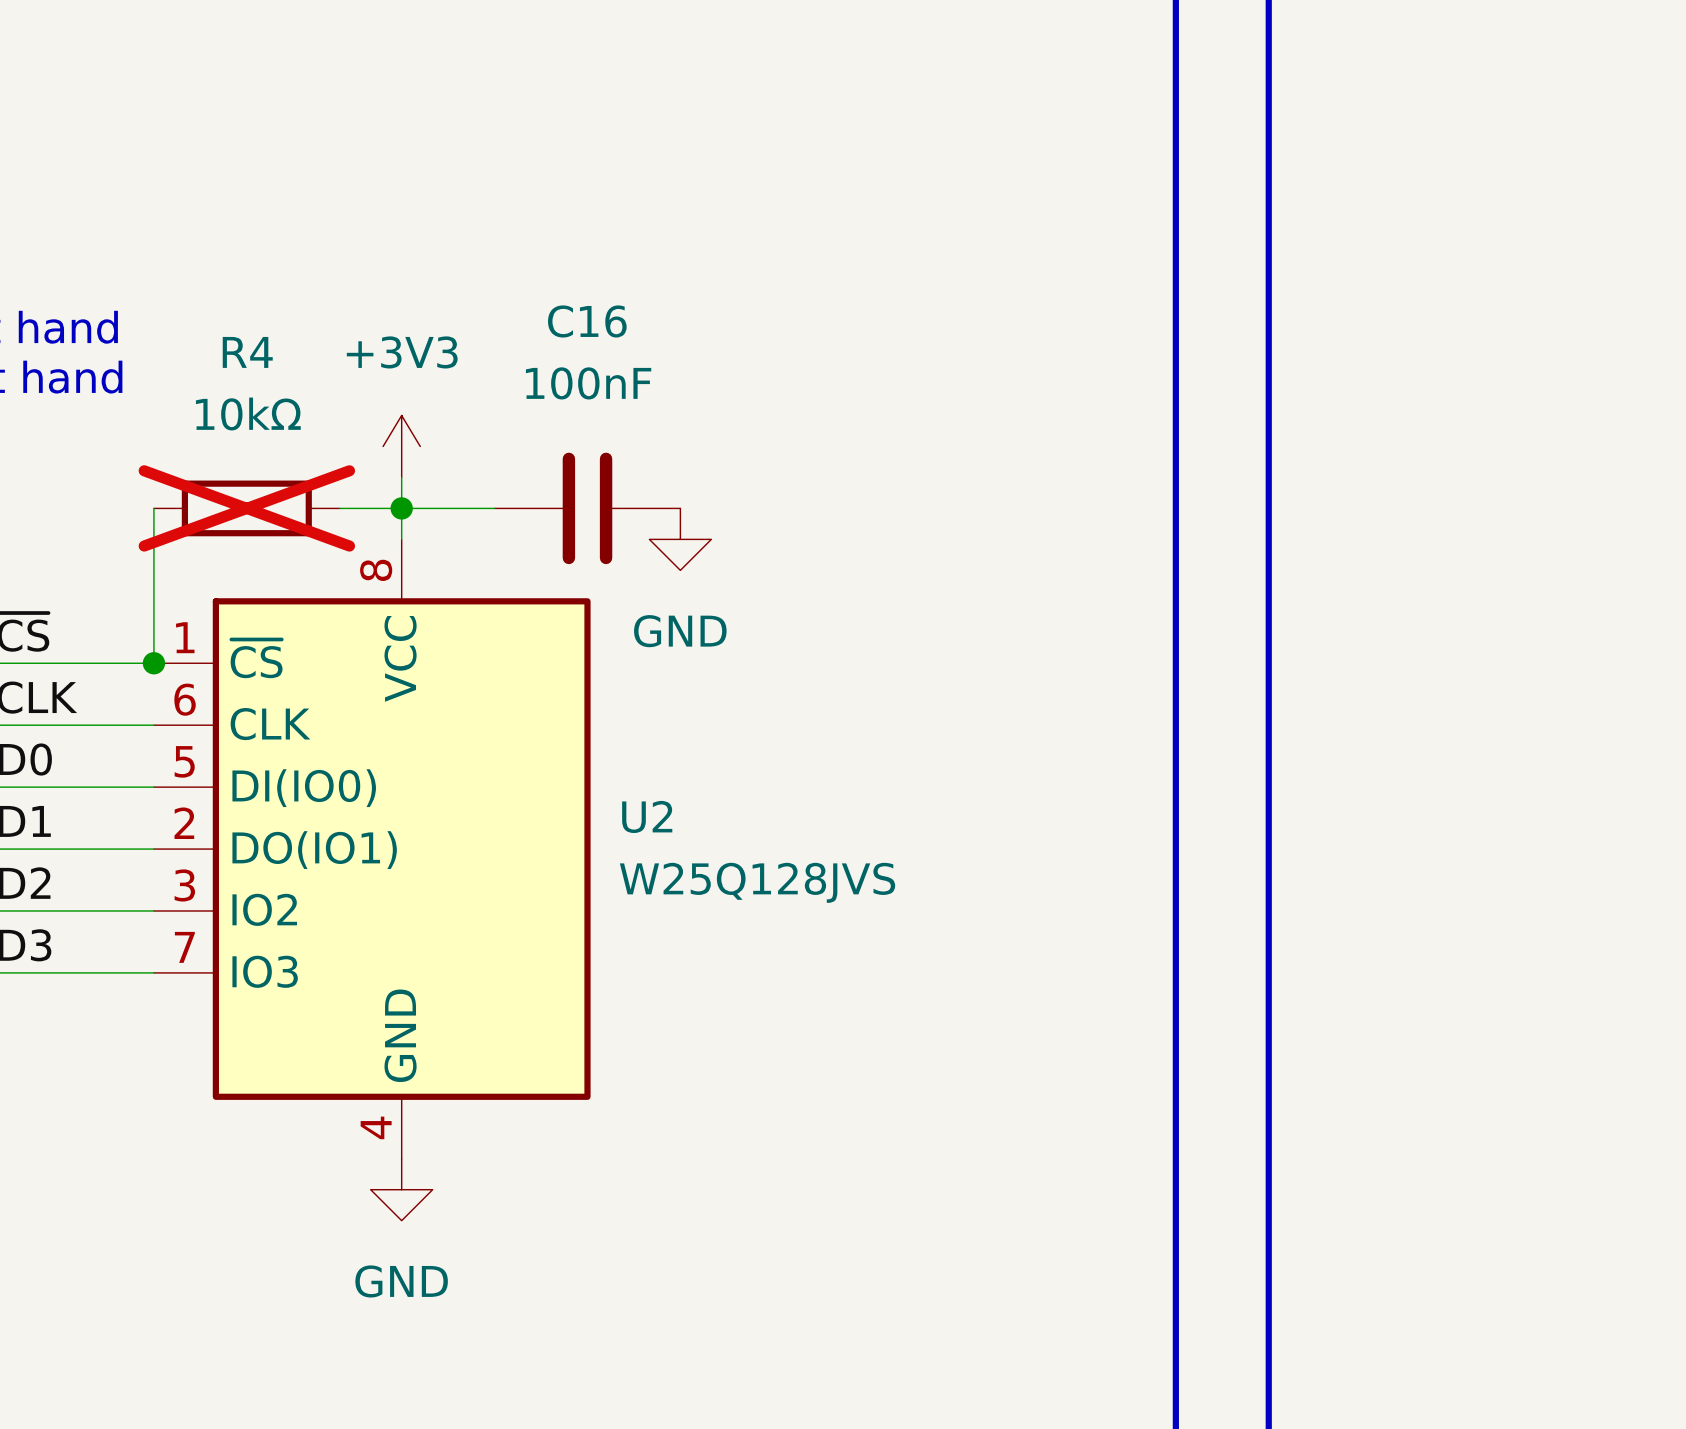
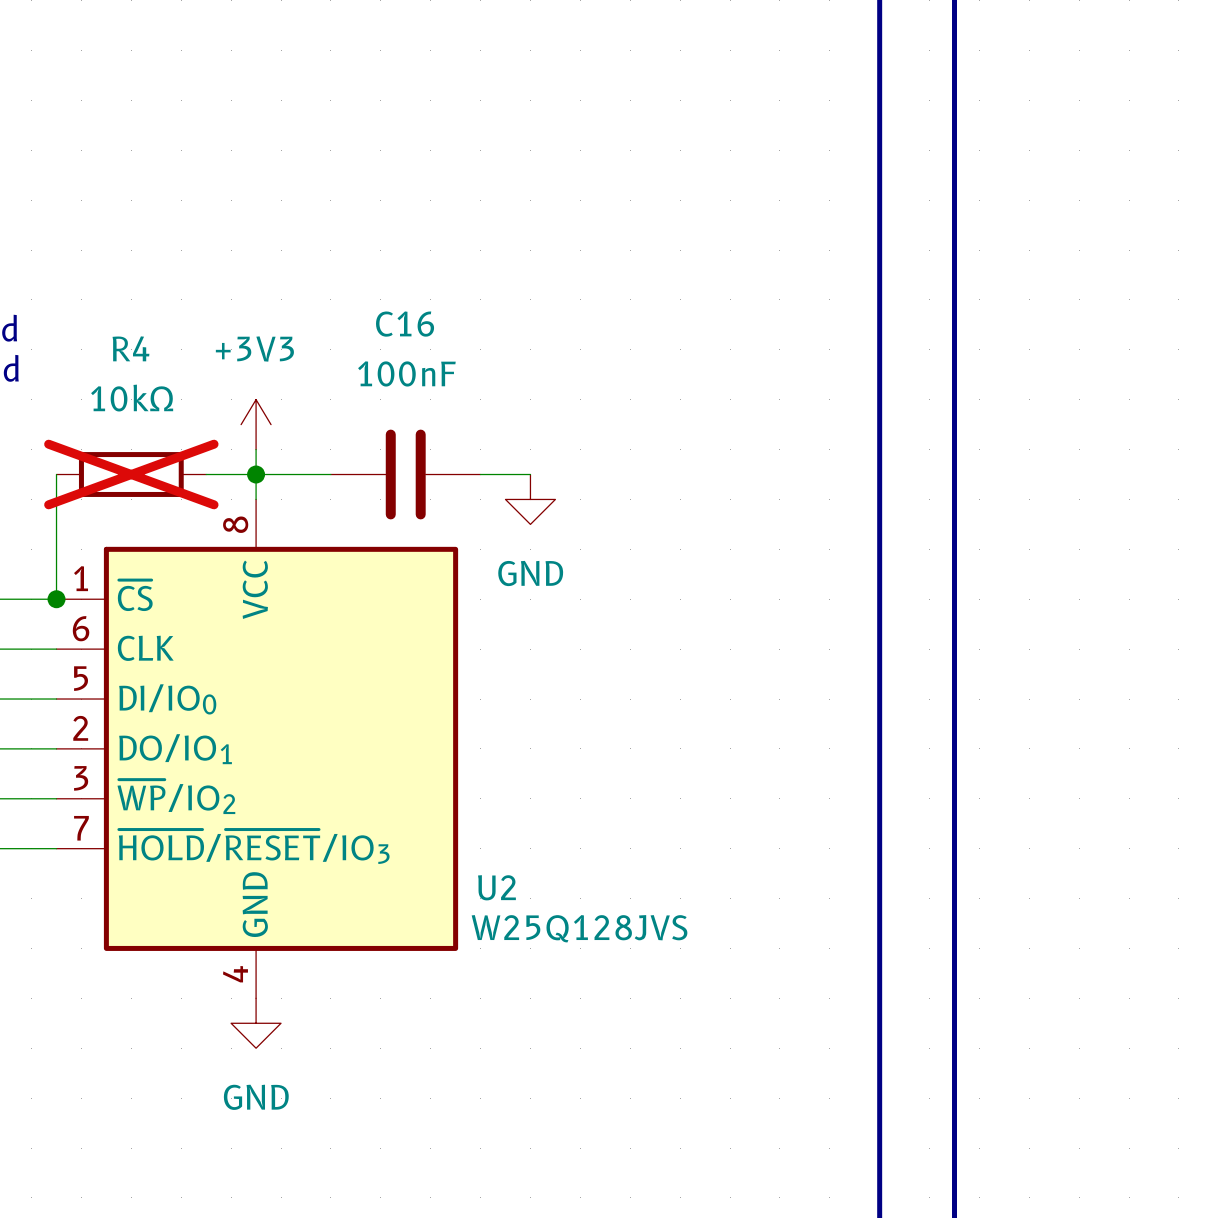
wire: none -> (480, 474) (530, 474)
U2 symbol: [153, 539, 591, 1159] -> [56, 499, 459, 999]
power symbol position: GND (680, 539) -> GND (530, 499)
U2 name position: U2 (647, 816) -> U2 (496, 887)
U2 value position: W25Q128JVS (757, 882) -> W25Q128JVS (579, 928)

